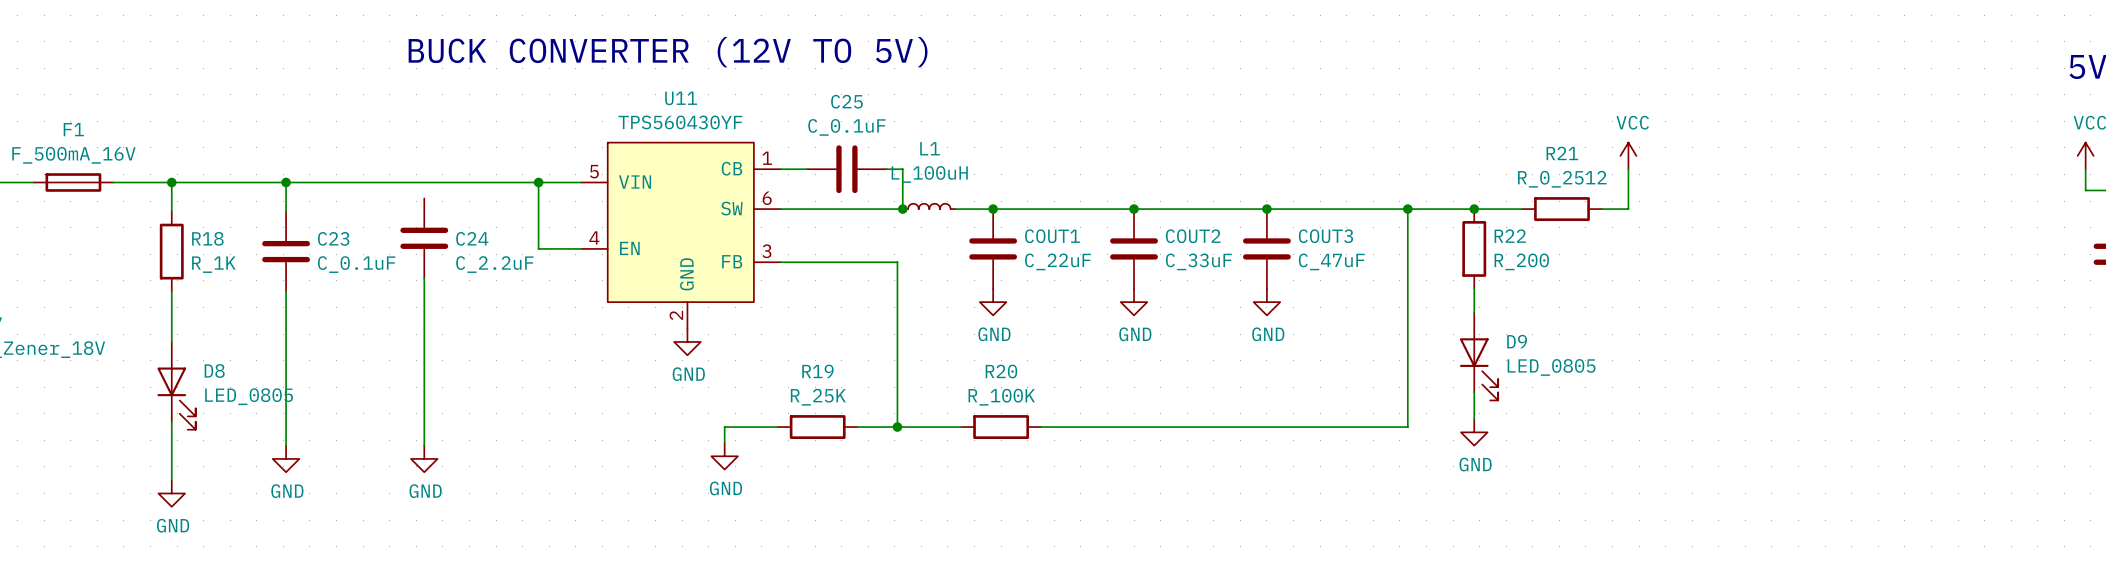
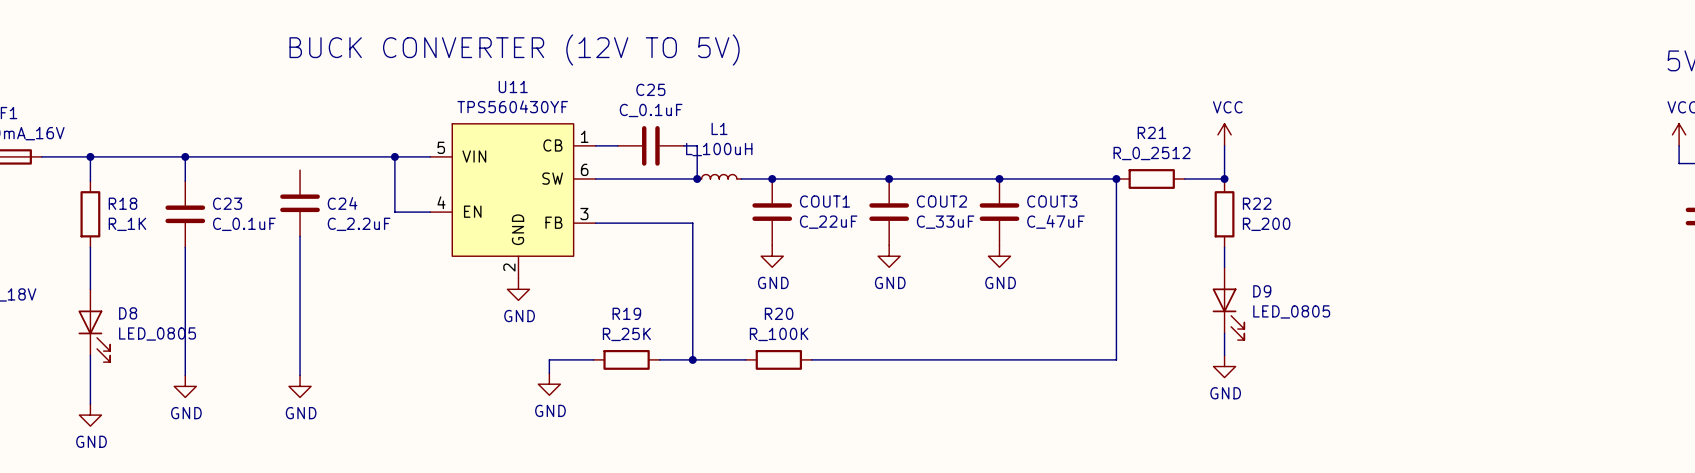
power symbol position: VCC (1628, 155) -> VCC (1224, 134)
wire: none -> (1224, 145) (1224, 181)
wire: (1628, 169) (1628, 209) (1601, 209) -> none
wire: (1410, 209) (1490, 209) -> none
junction: (1474, 209) -> none
junction: none -> (1224, 178)
R21 position: (1561, 209) -> (1151, 178)
R22 position: (1474, 248) -> (1224, 214)
wire: (1474, 288) (1474, 312) -> (1224, 247) (1224, 267)
D9 position: (1479, 356) -> (1228, 303)
wire: (1474, 392) (1474, 419) -> (1224, 333) (1224, 355)
power symbol position: GND (1474, 432) -> GND (1224, 366)

